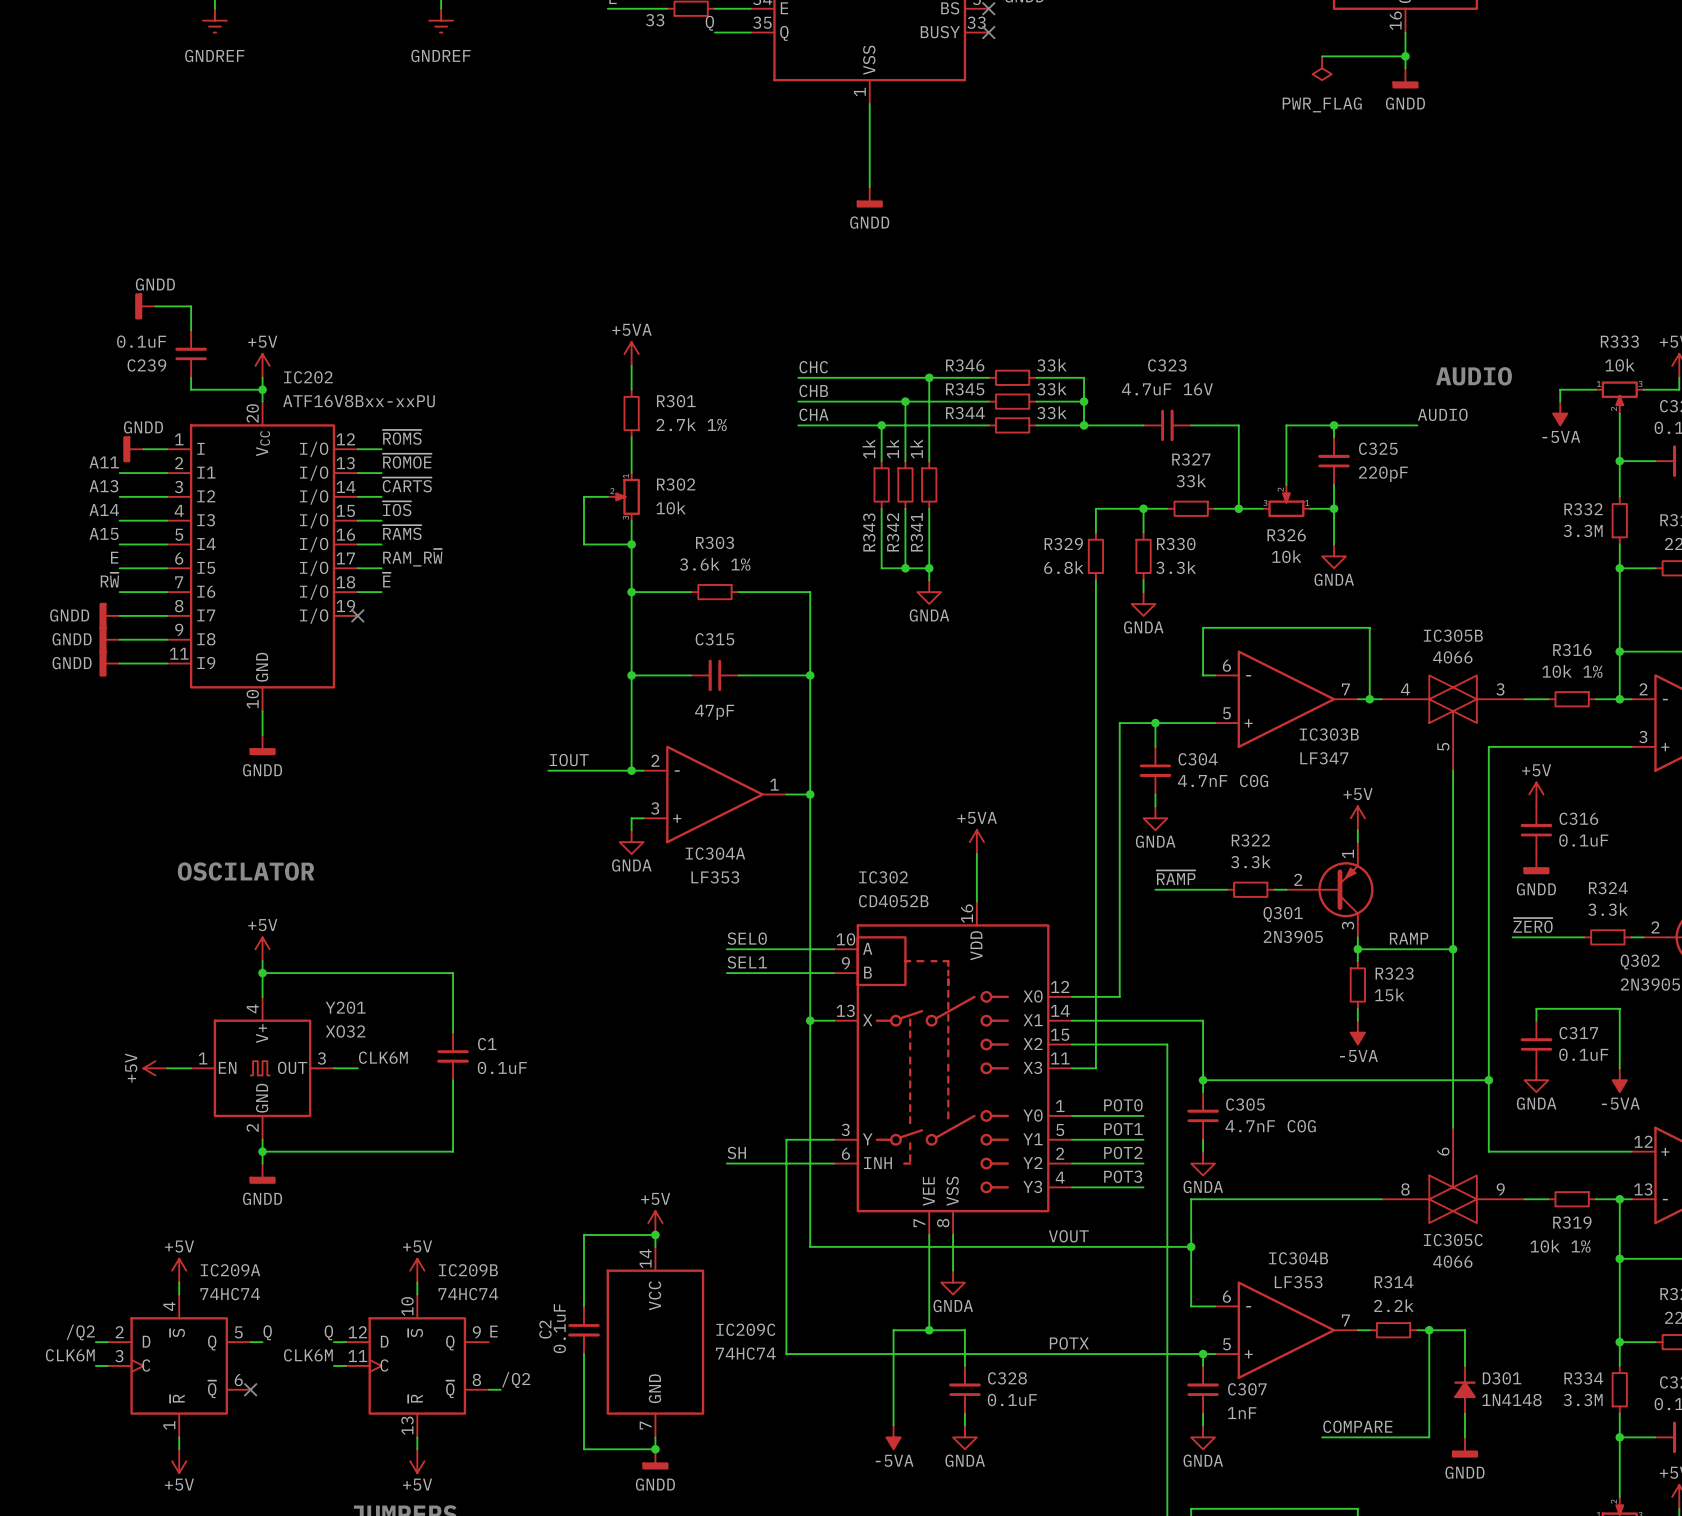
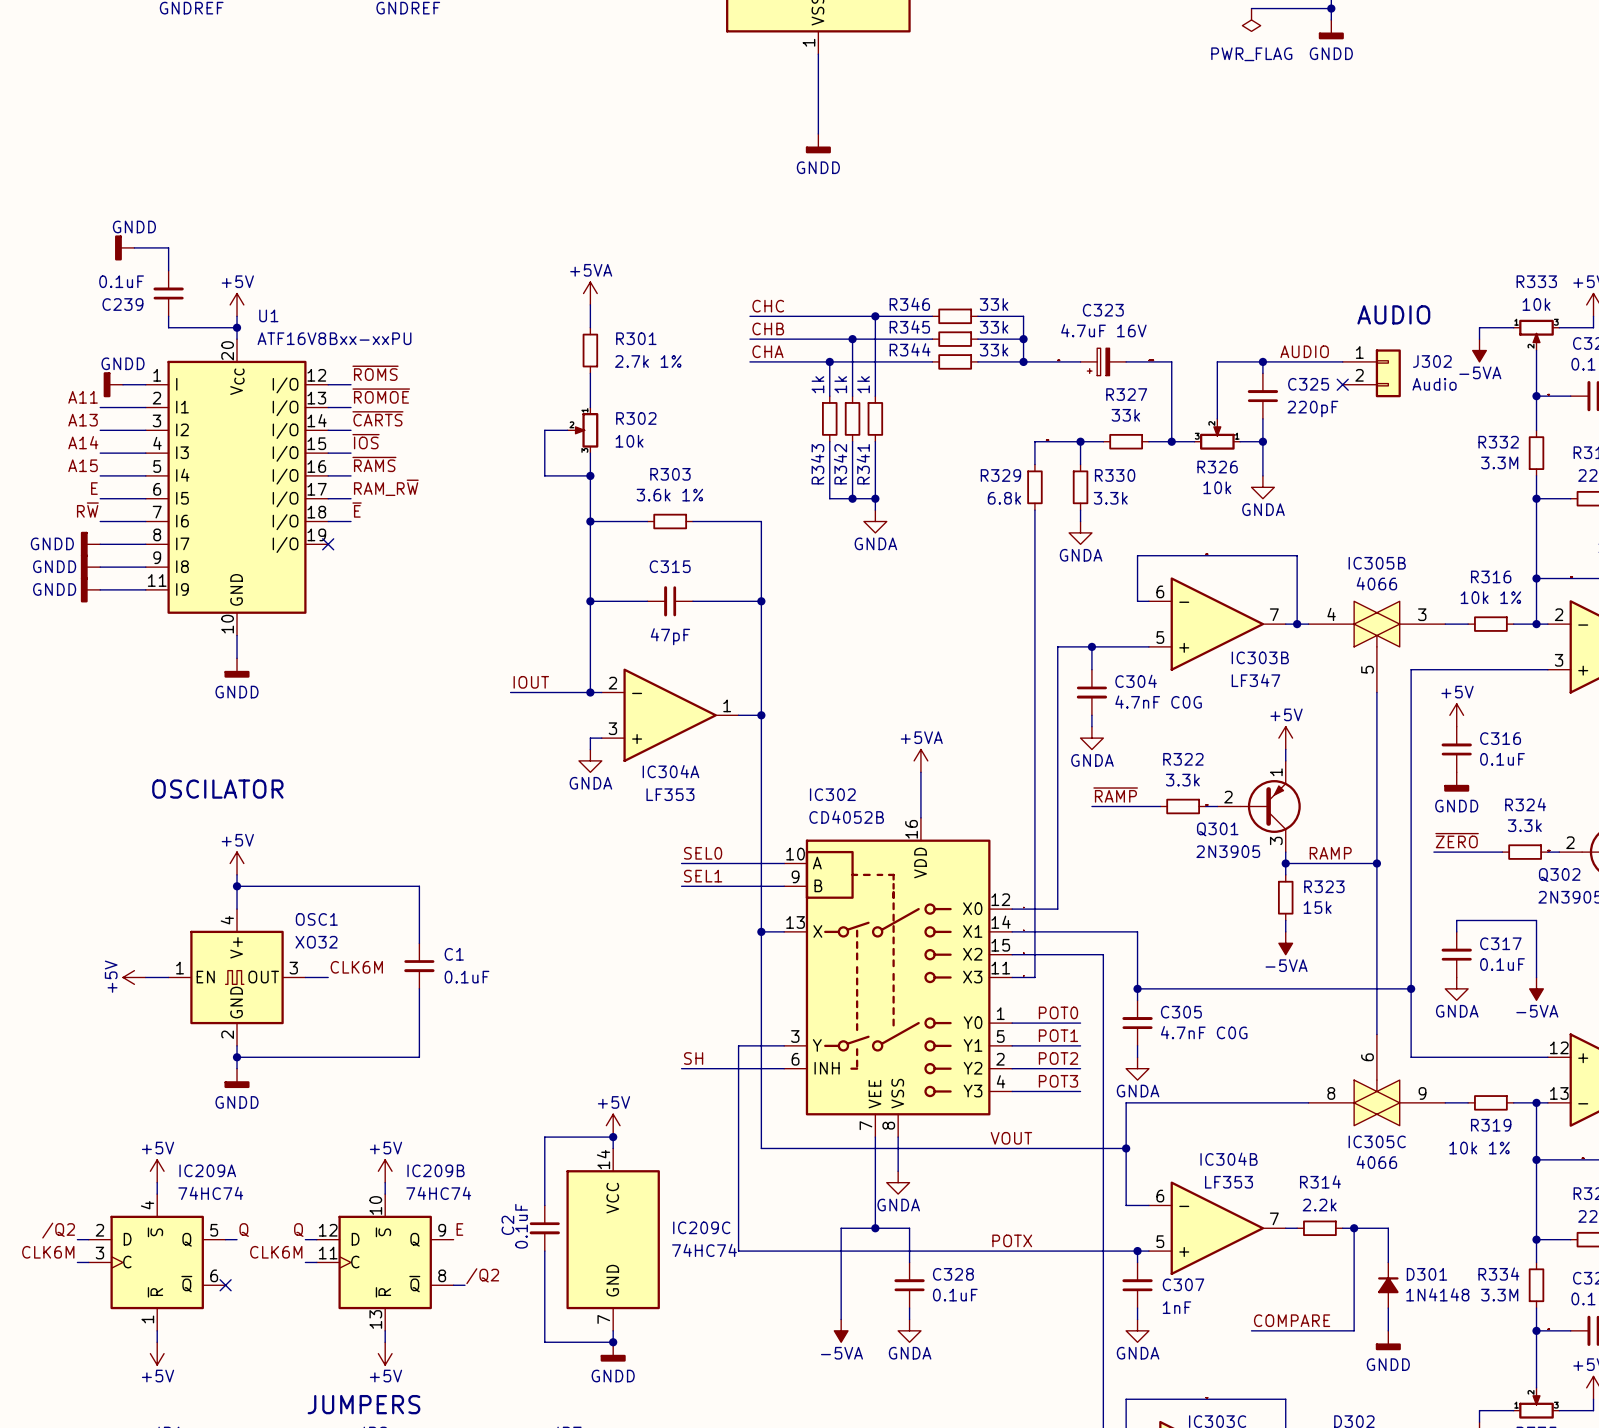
IC202 name: IC202 (308, 377) -> U1 (268, 315)
C323 symbol: [1143, 409, 1192, 442] -> [1080, 348, 1127, 376]
label position: AUDIO (1442, 414) -> AUDIO (1304, 351)
J302: none -> Audio (1371, 373)
no-connect mark: none -> (1342, 384)
Y201 name: Y201 (345, 1007) -> OSC1 (316, 919)

